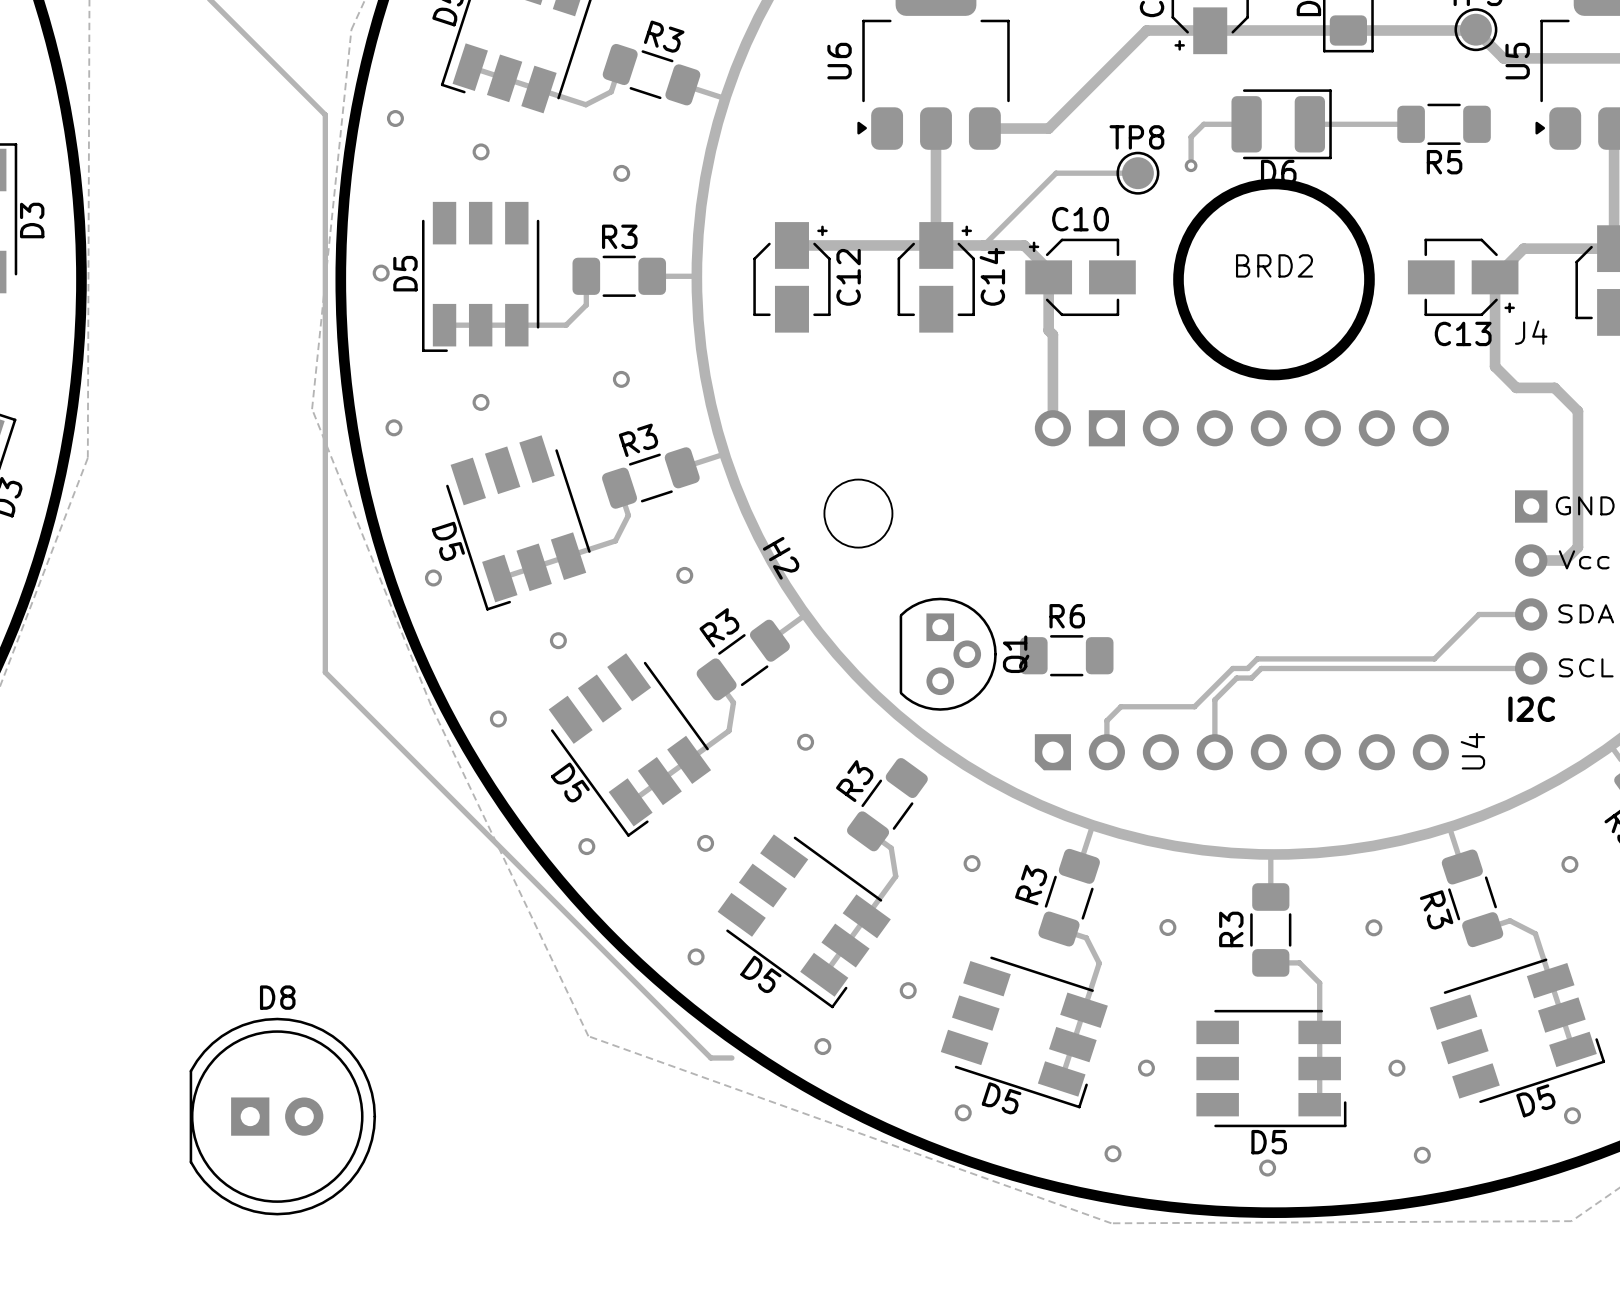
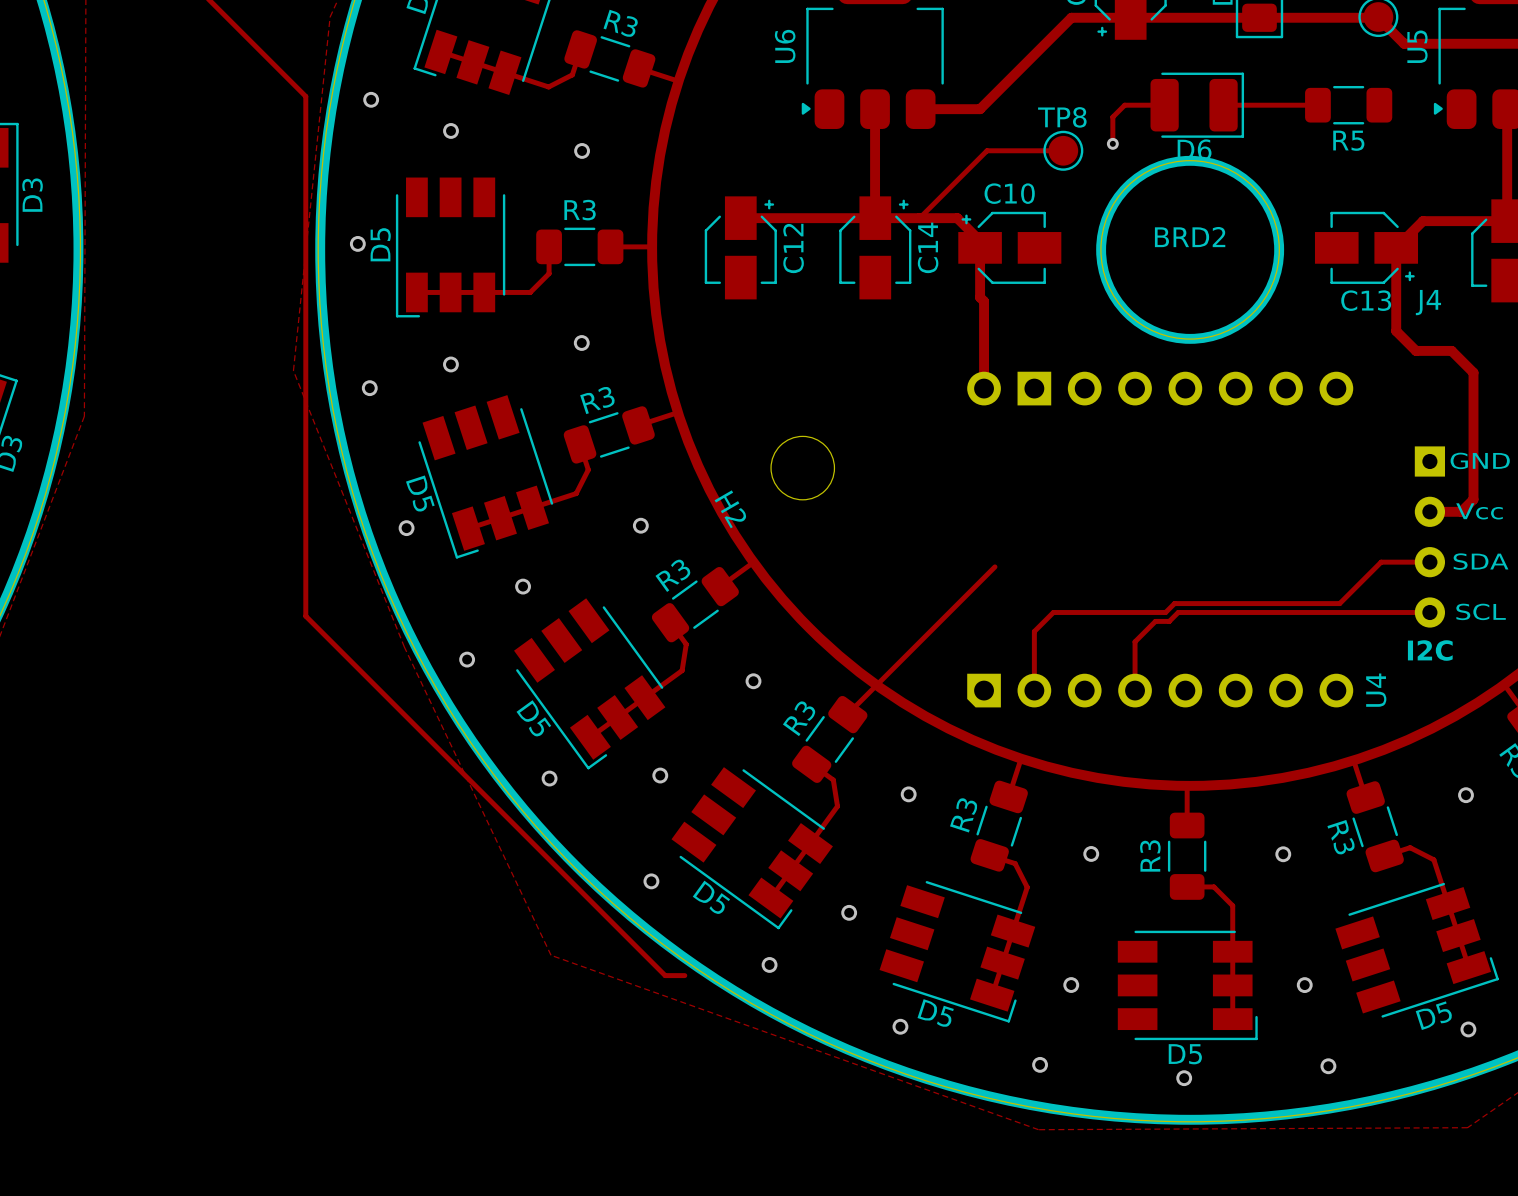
track: none -> (994, 566) (847, 714)
Q1: (948, 654) -> none
R6: (1066, 655) -> none
track: (1232, 668) (1194, 706) (1120, 706) (1106, 720) -> (1151, 612) (1053, 612) (1034, 631) (1034, 661)
D8: (282, 1116) -> none

